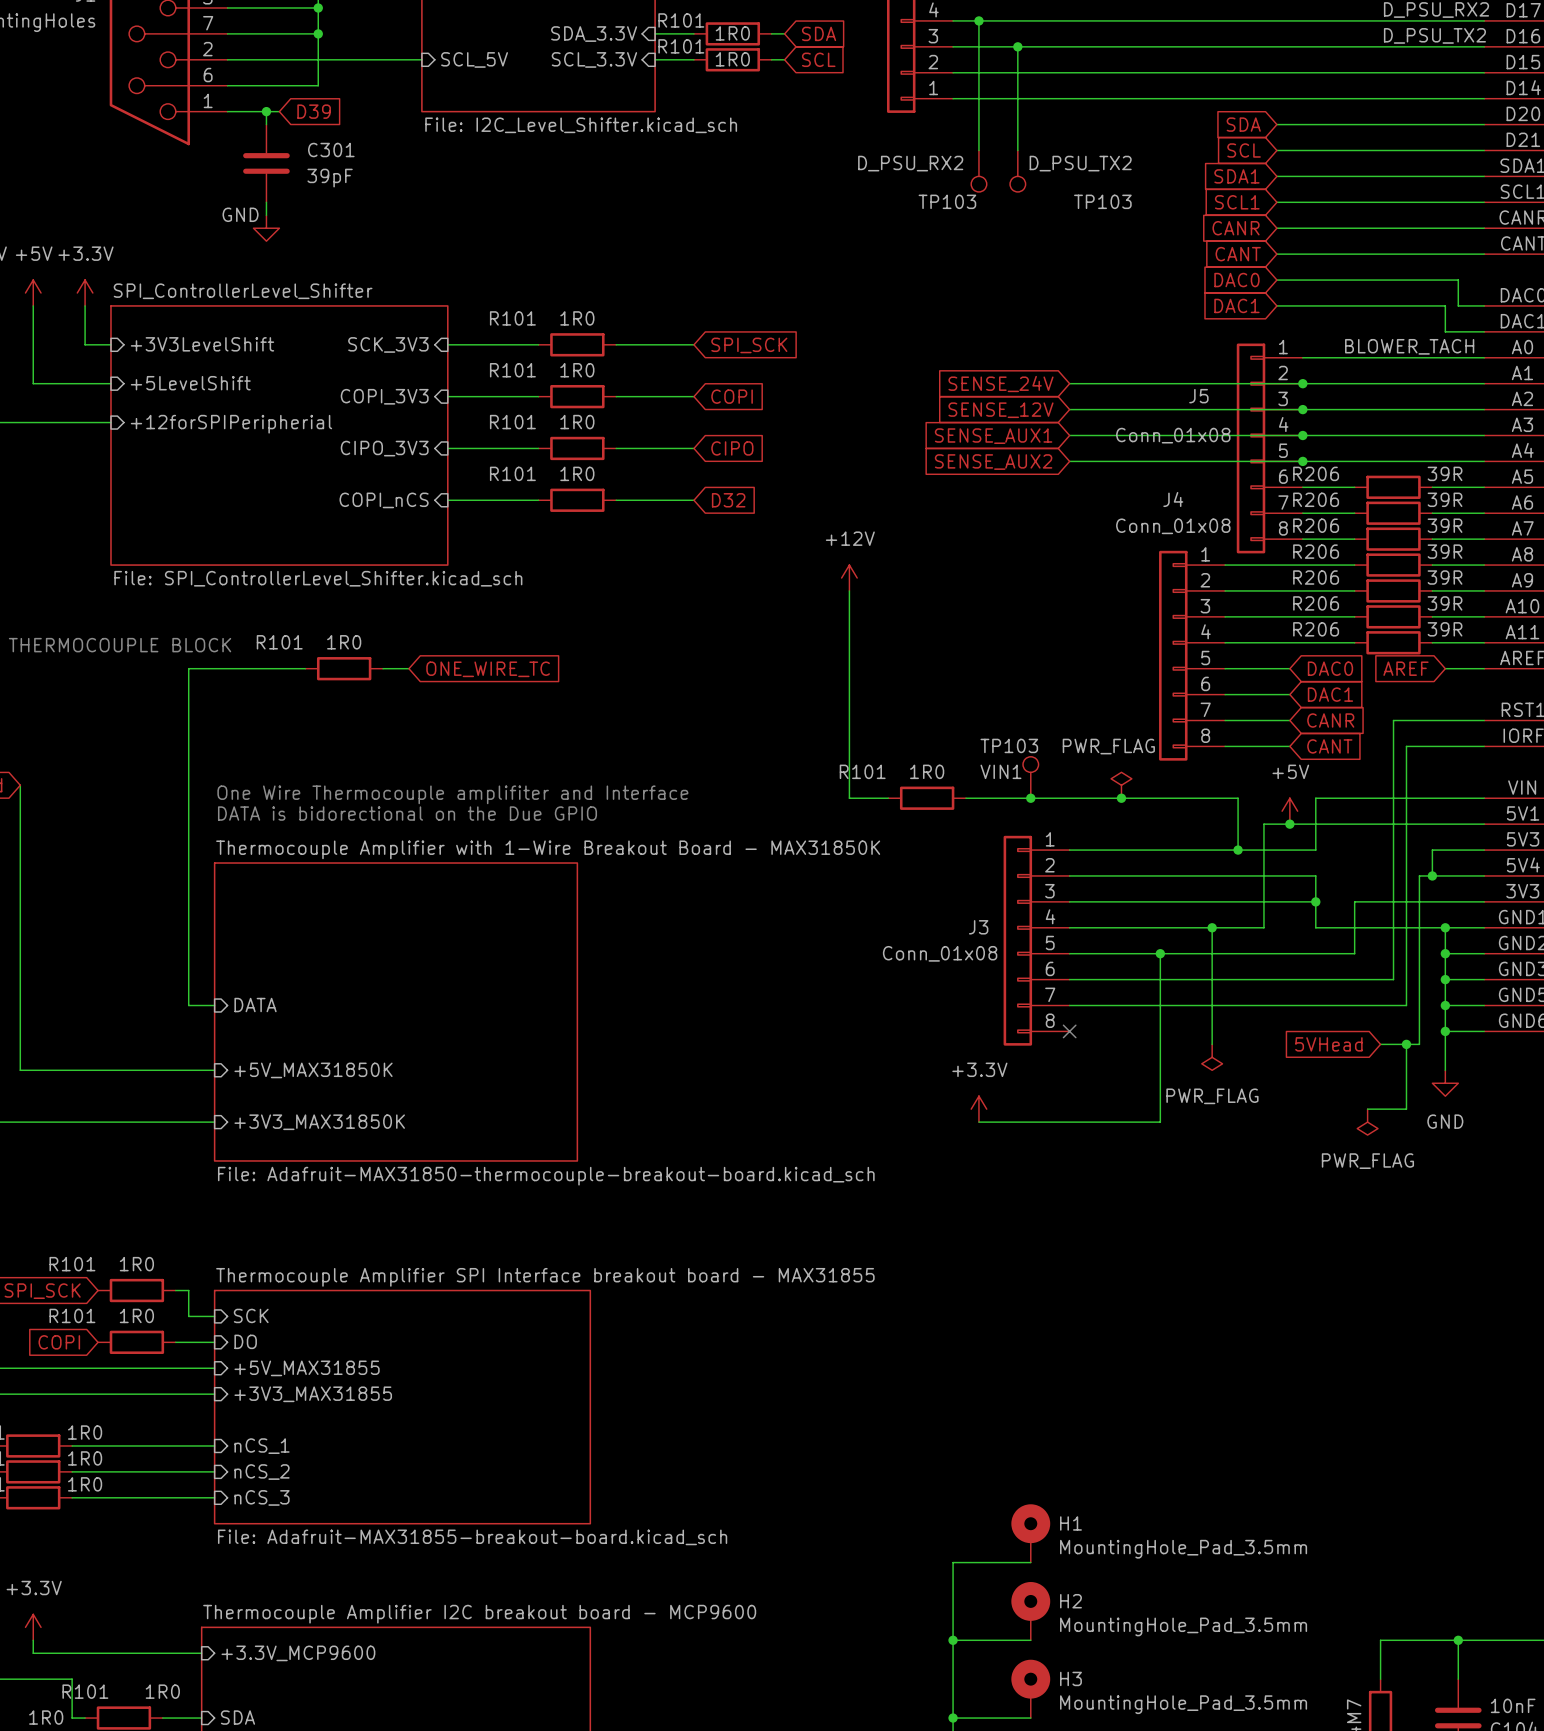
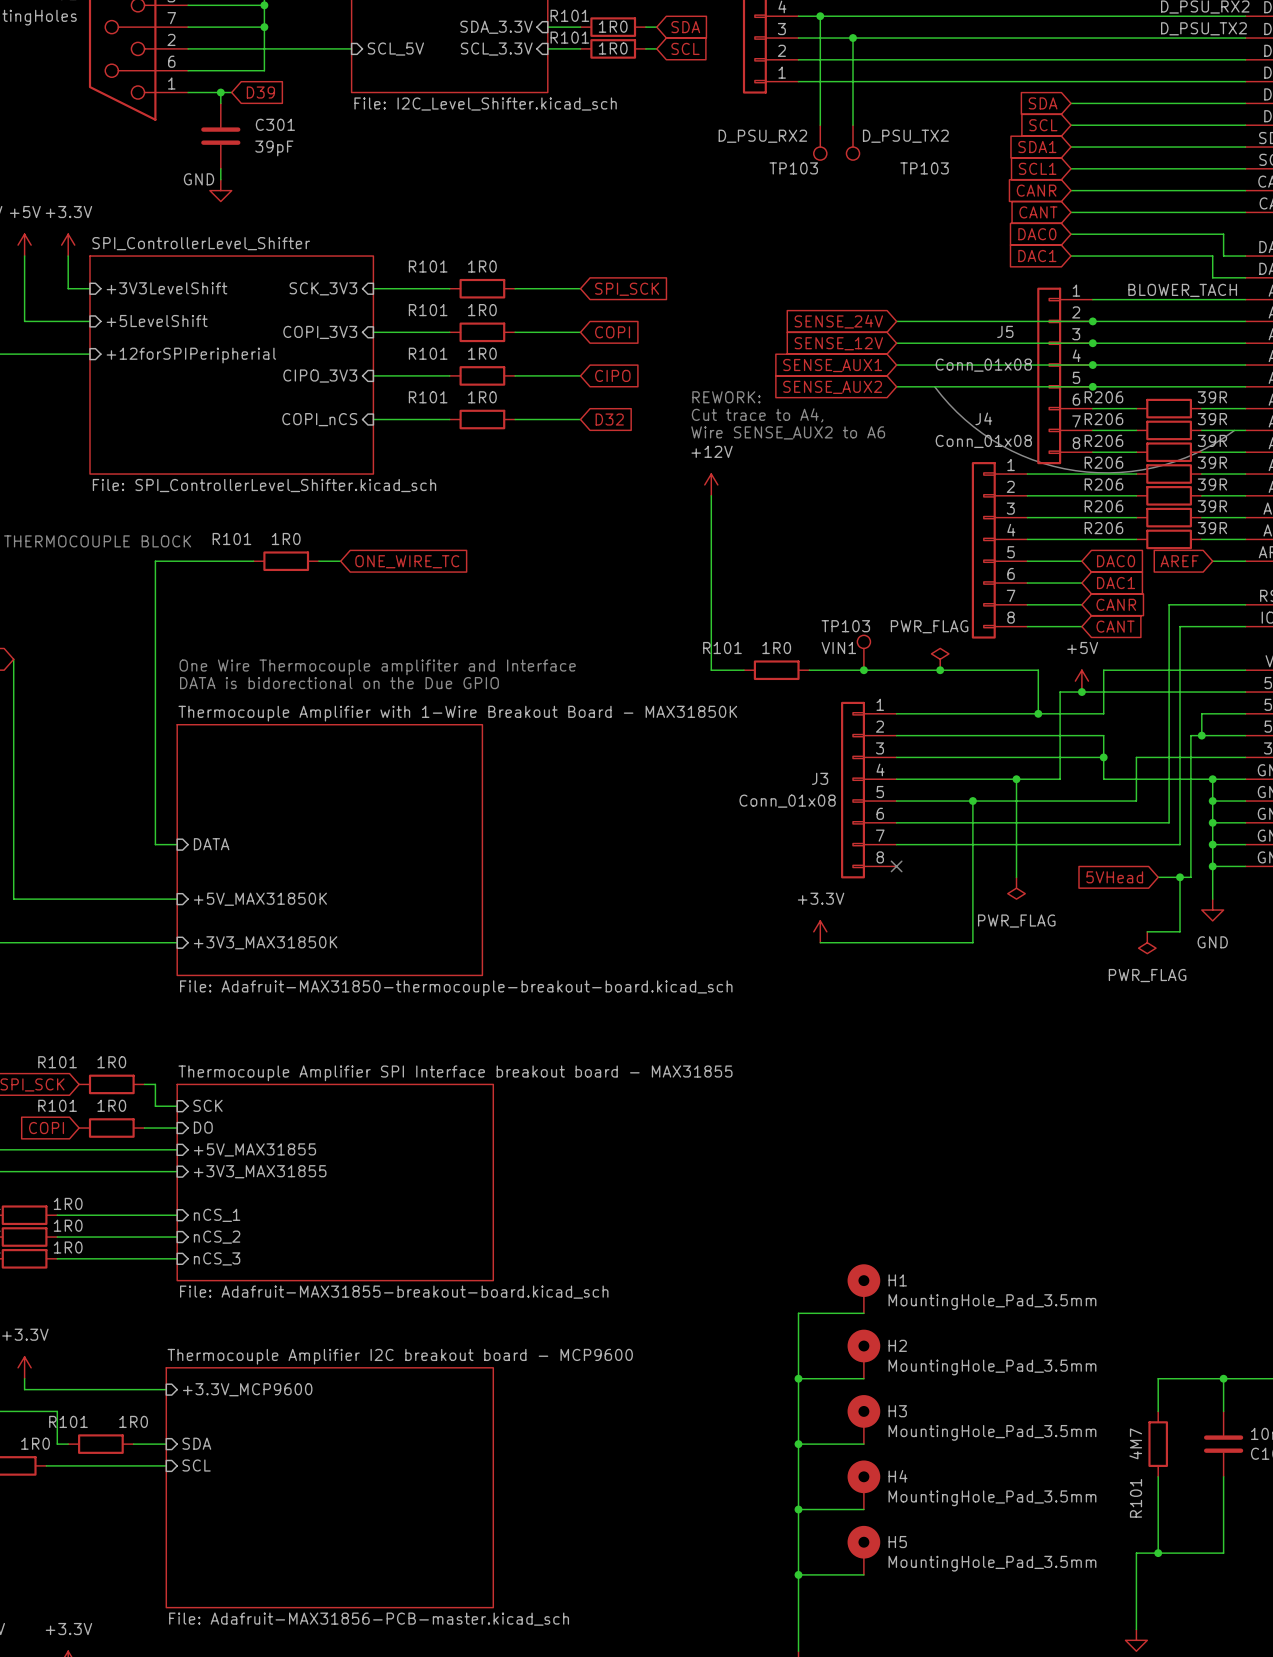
line: none -> (934, 386) (965, 419) (1001, 445) (1032, 459) (1075, 470) (1120, 472) (1164, 464) (1206, 448) (1234, 430)
text: none -> REWORK: (726, 397)
text: none -> Cut trace to A4, (757, 415)
text: none -> Wire SENSE_AUX2 to A6 (788, 432)

